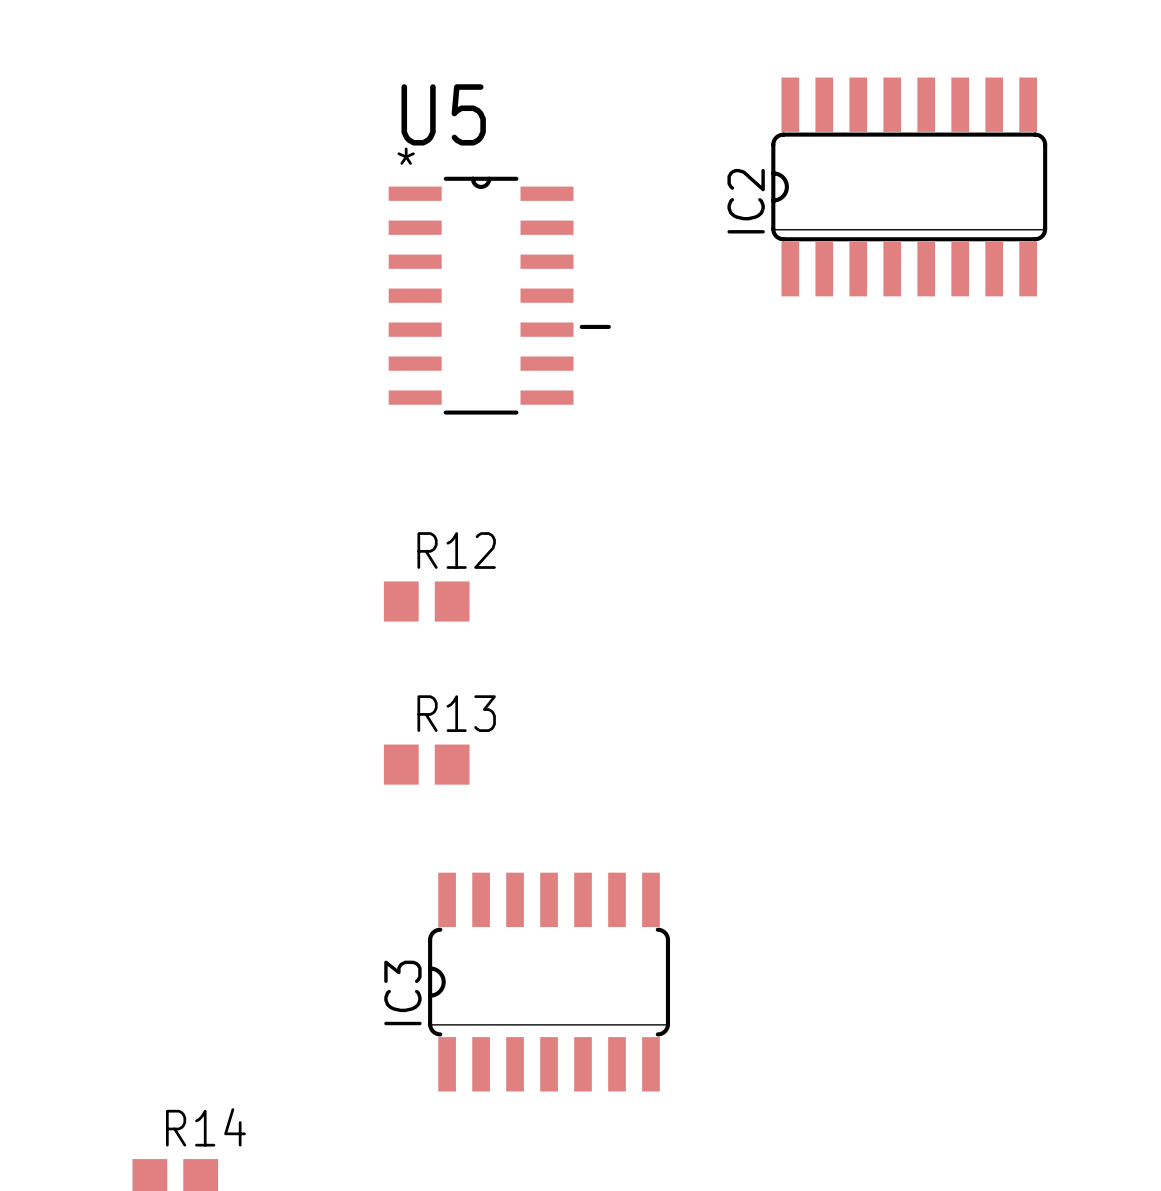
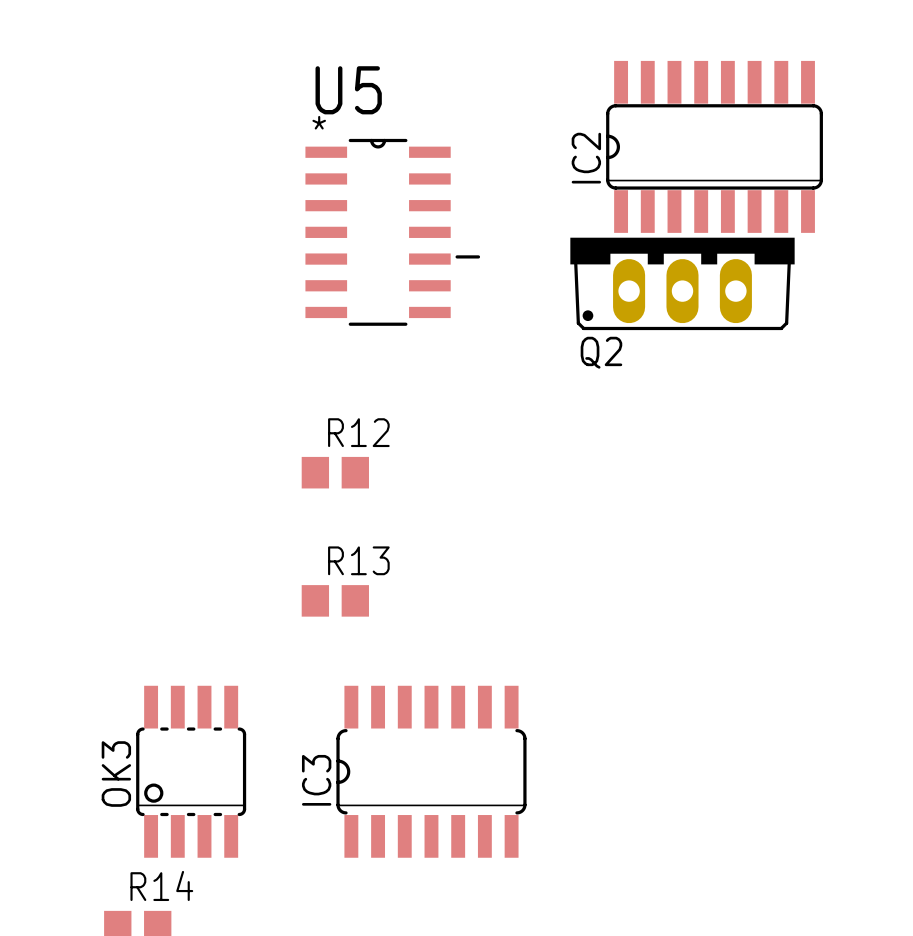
Q2: none -> (682, 283)
OK3: none -> (191, 771)

